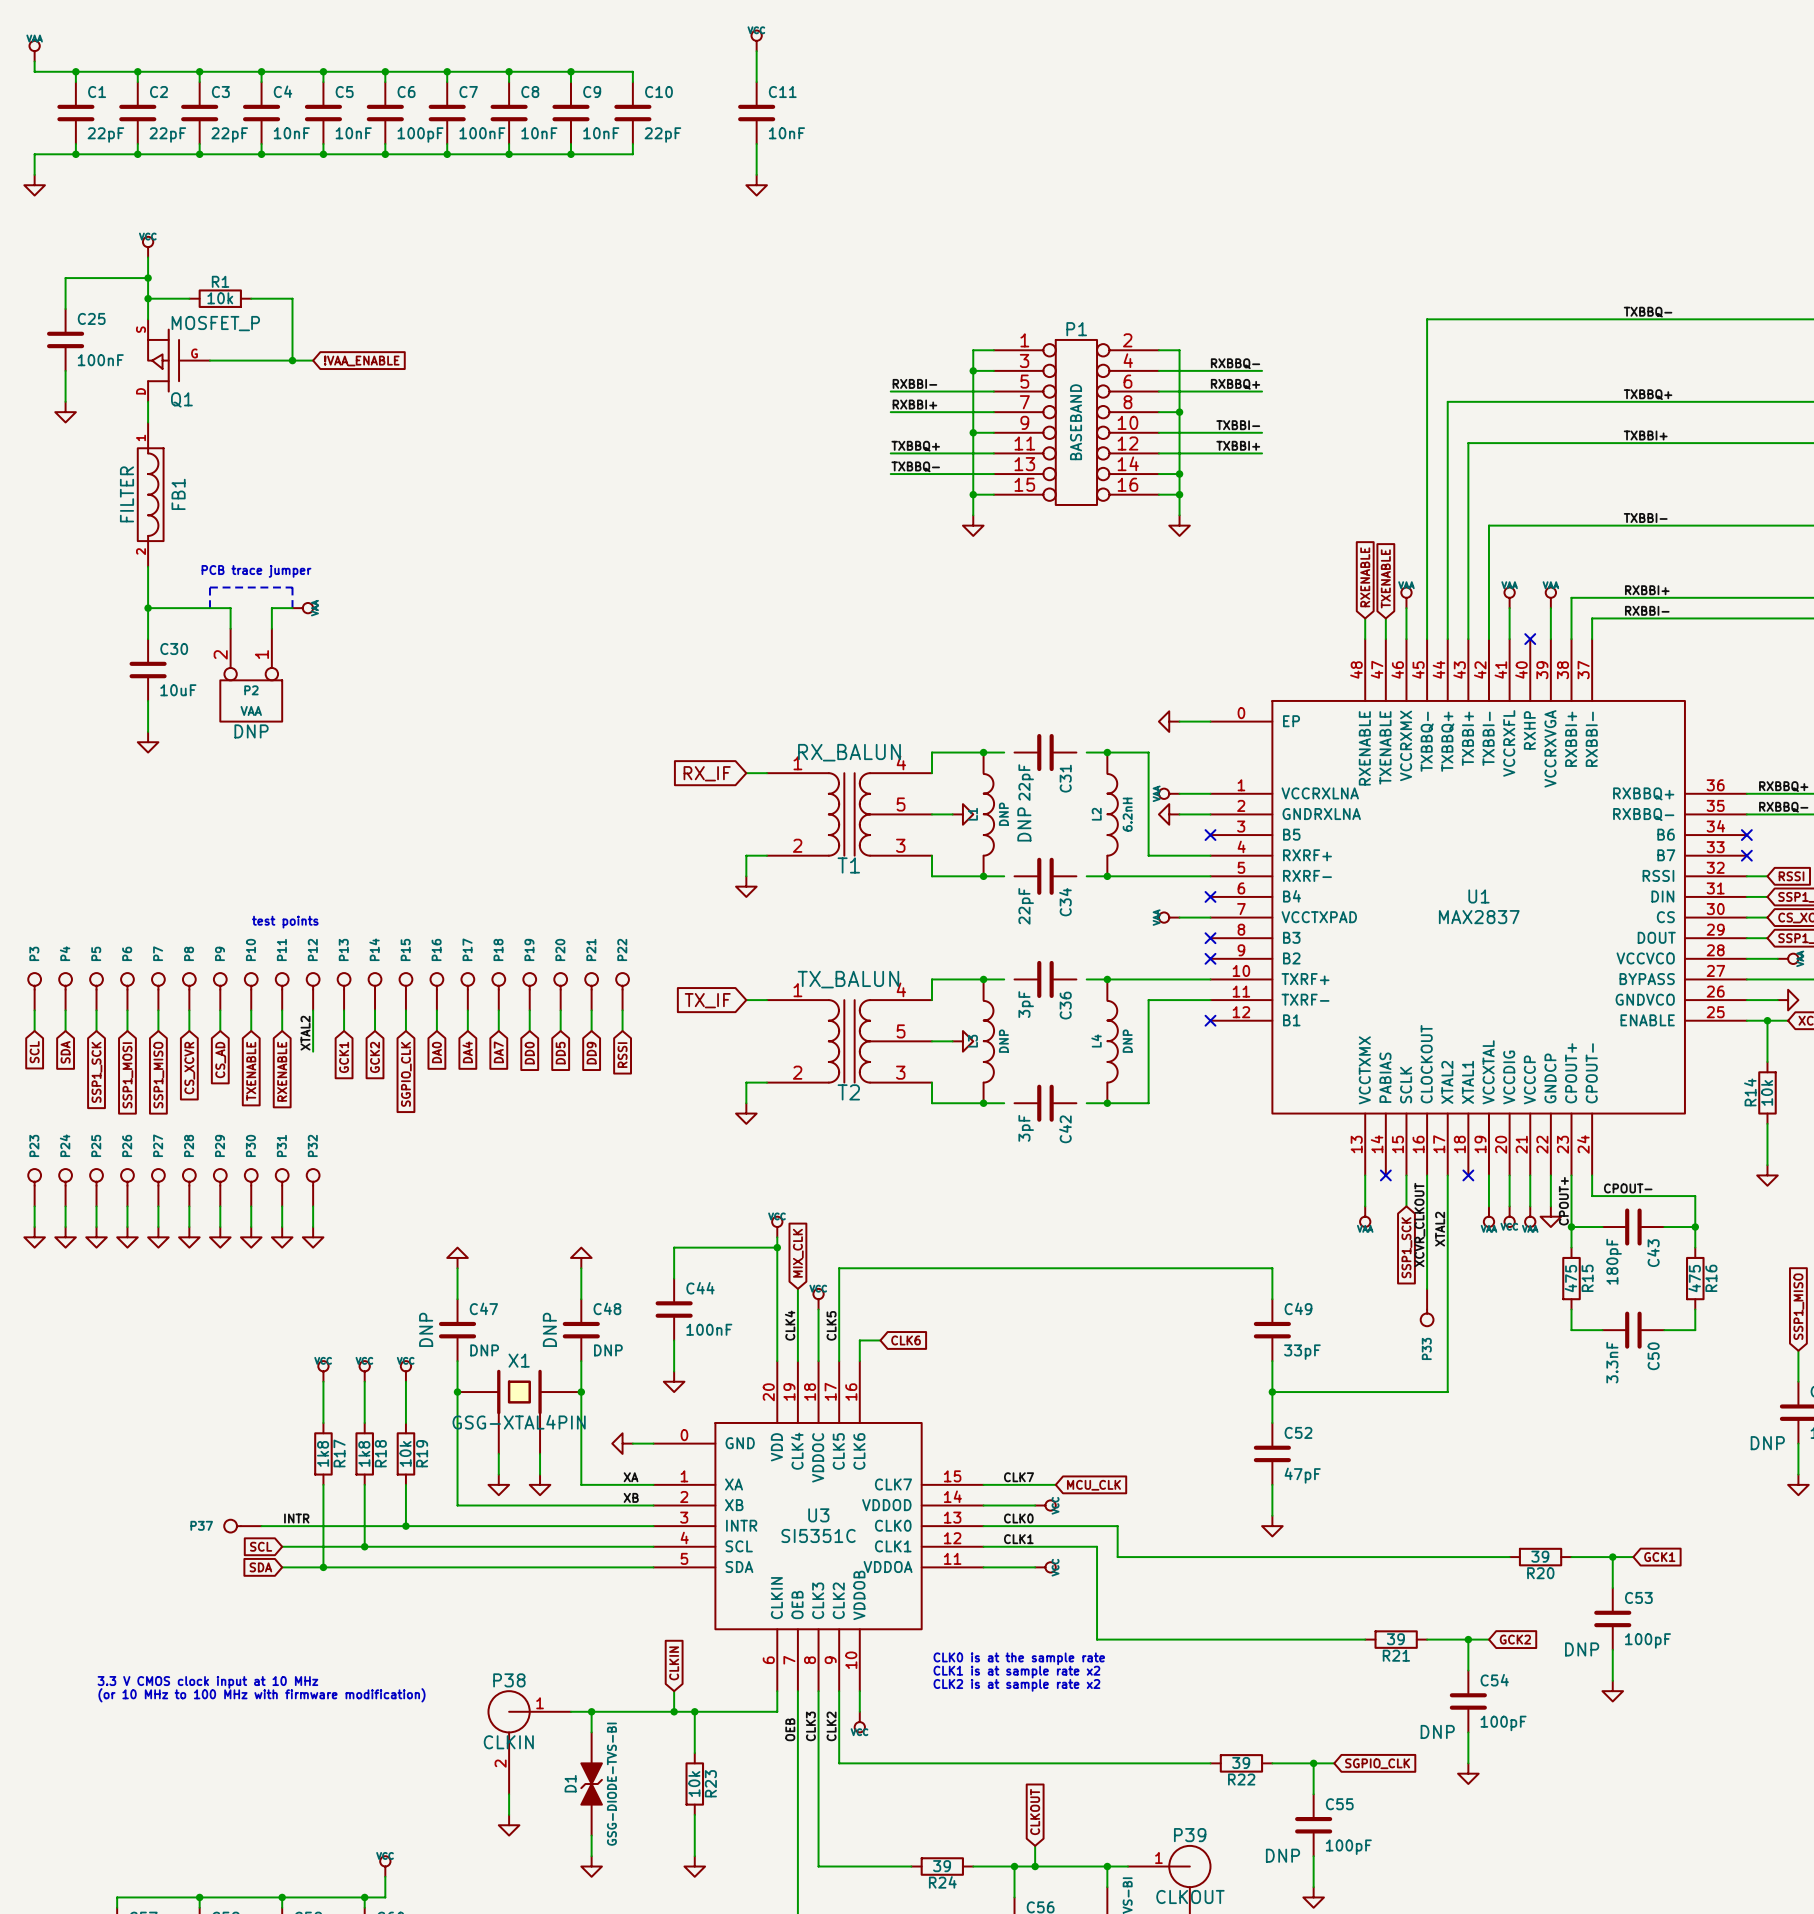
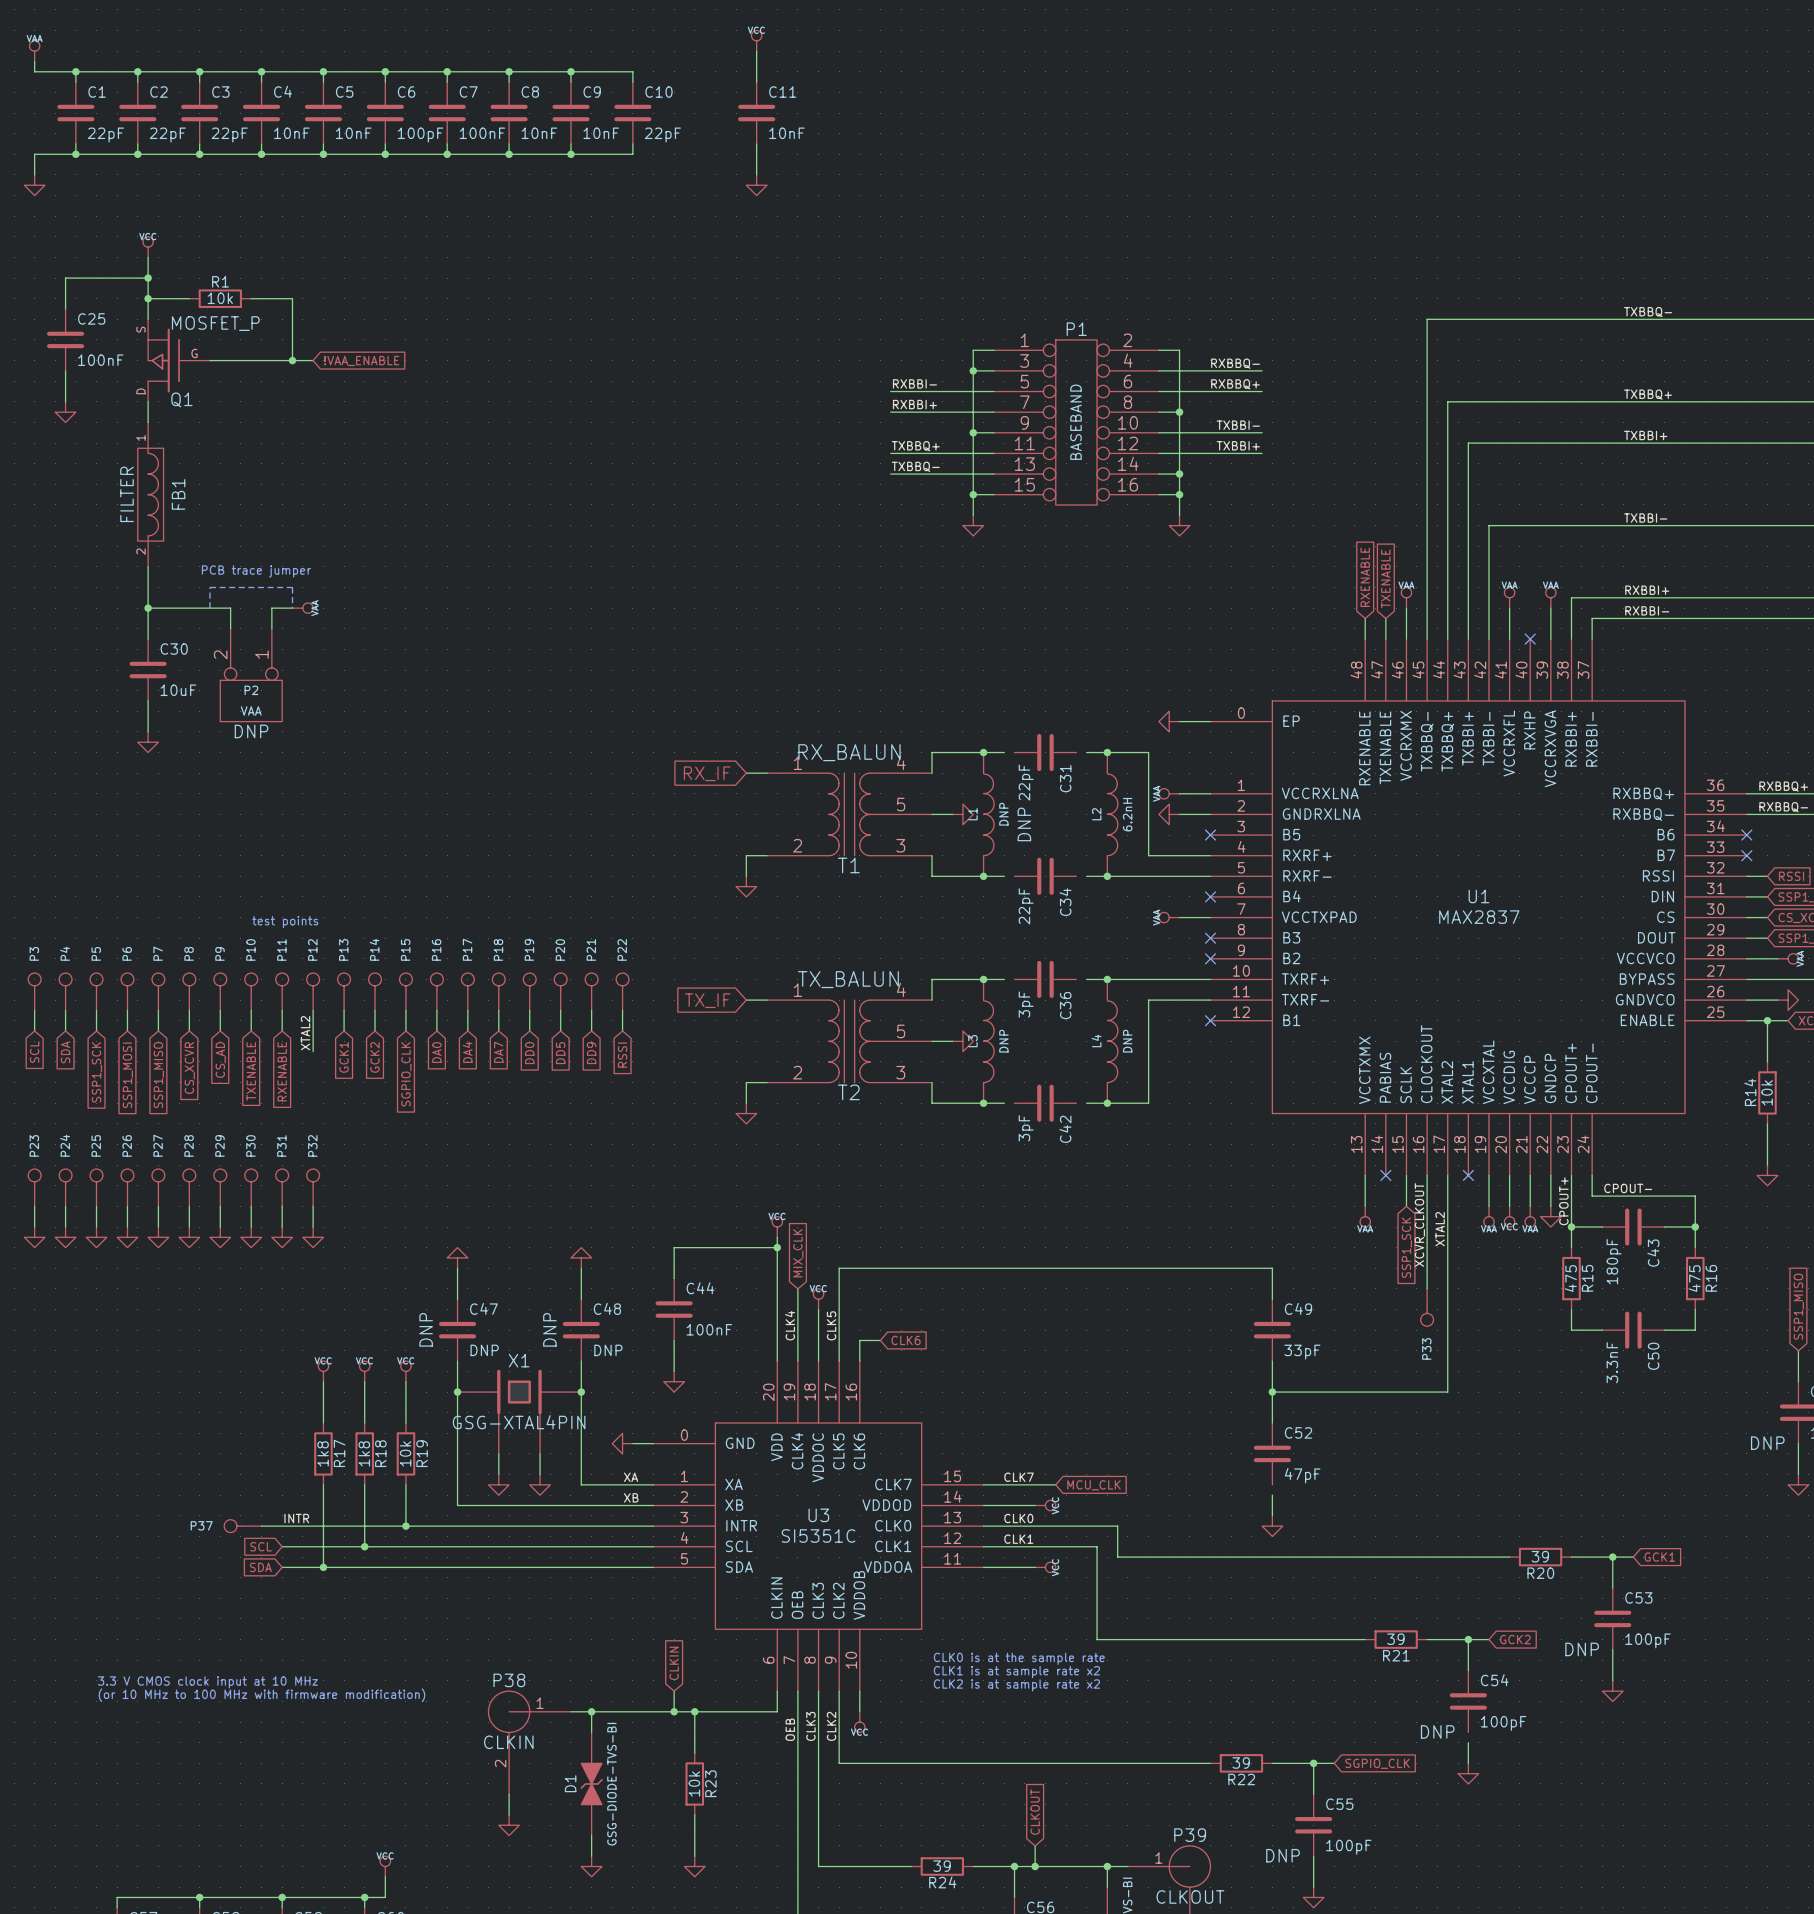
wire: (1272, 1484) (1272, 1495) -> none
wire: (1468, 1732) (1468, 1742) -> none

